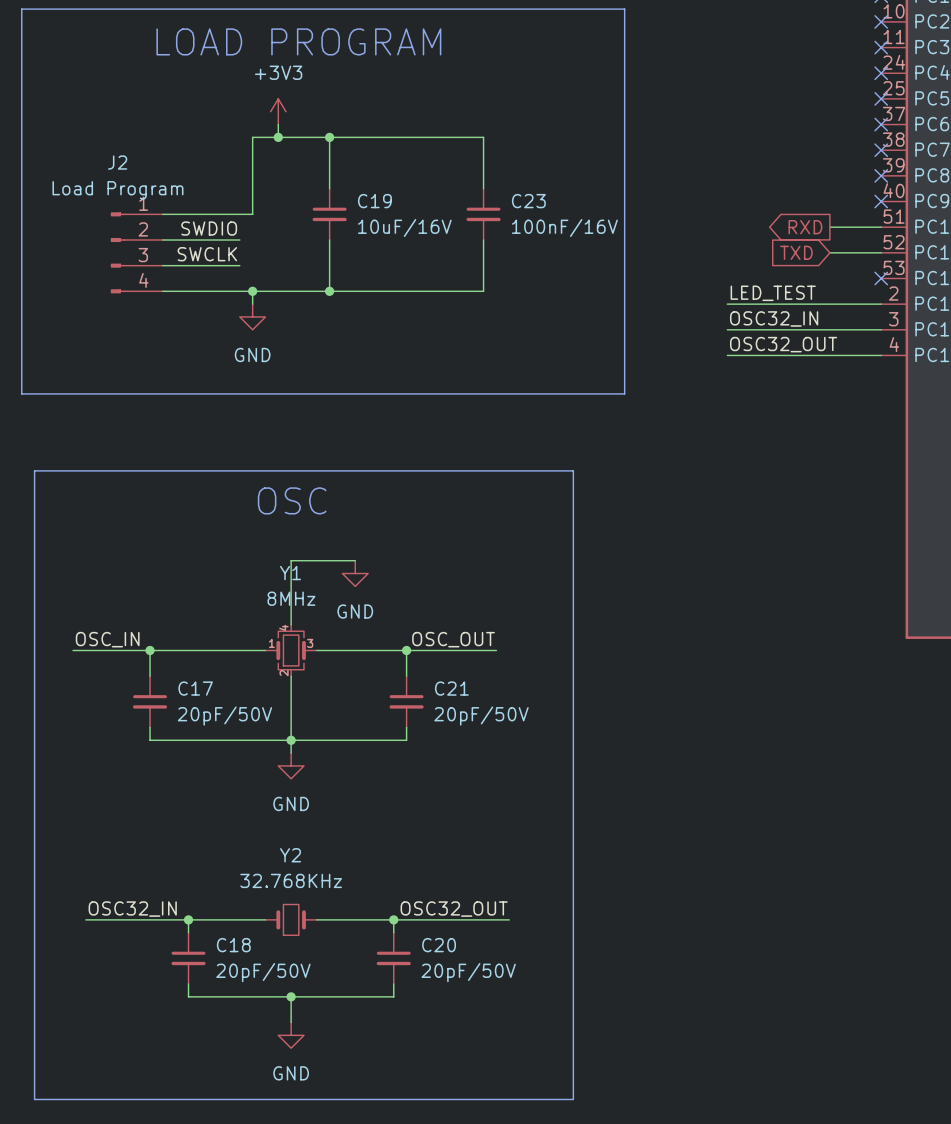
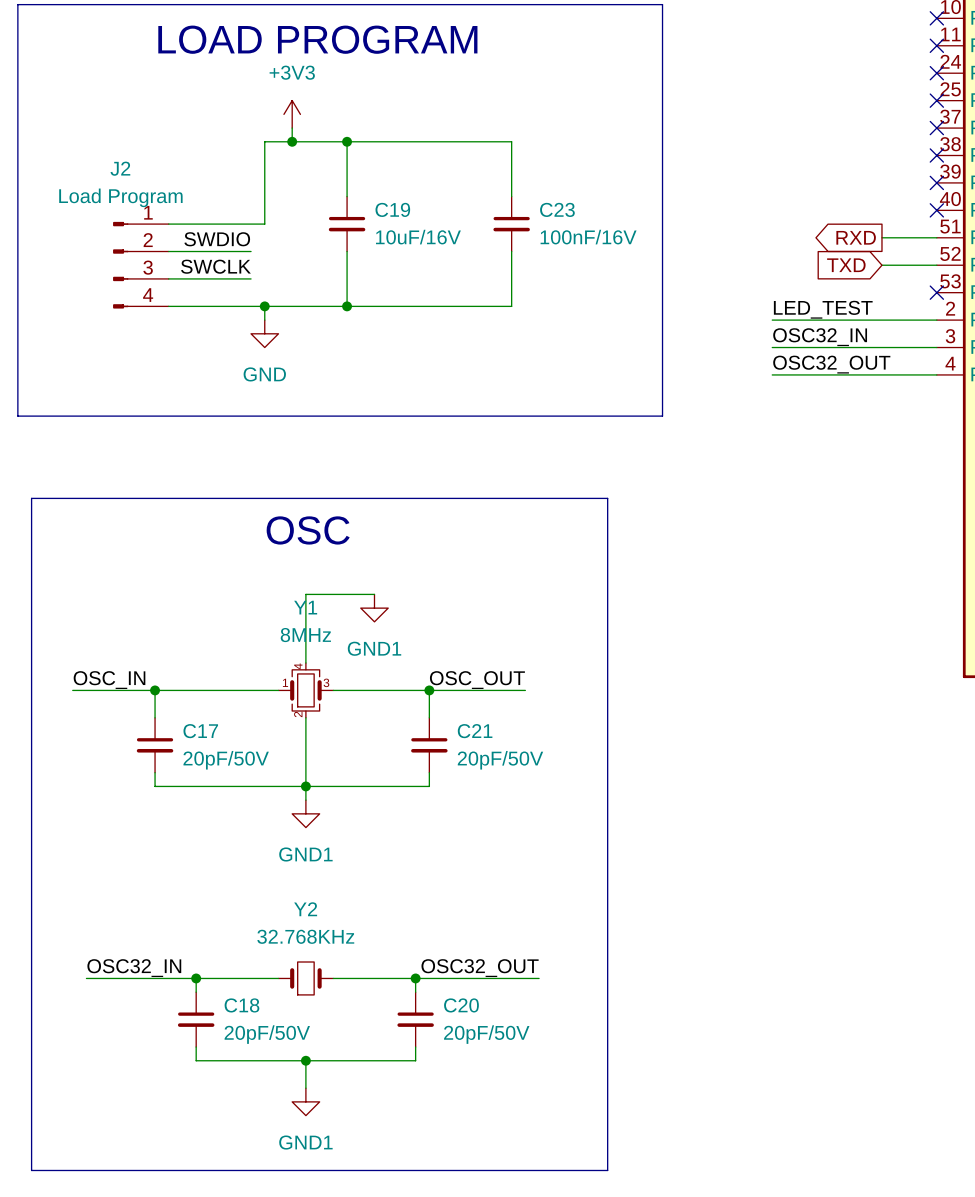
power symbol: GND (355, 573) -> GND1 (374, 608)
power symbol: GND (291, 765) -> GND1 (305, 813)
power symbol: GND (291, 1035) -> GND1 (305, 1101)

